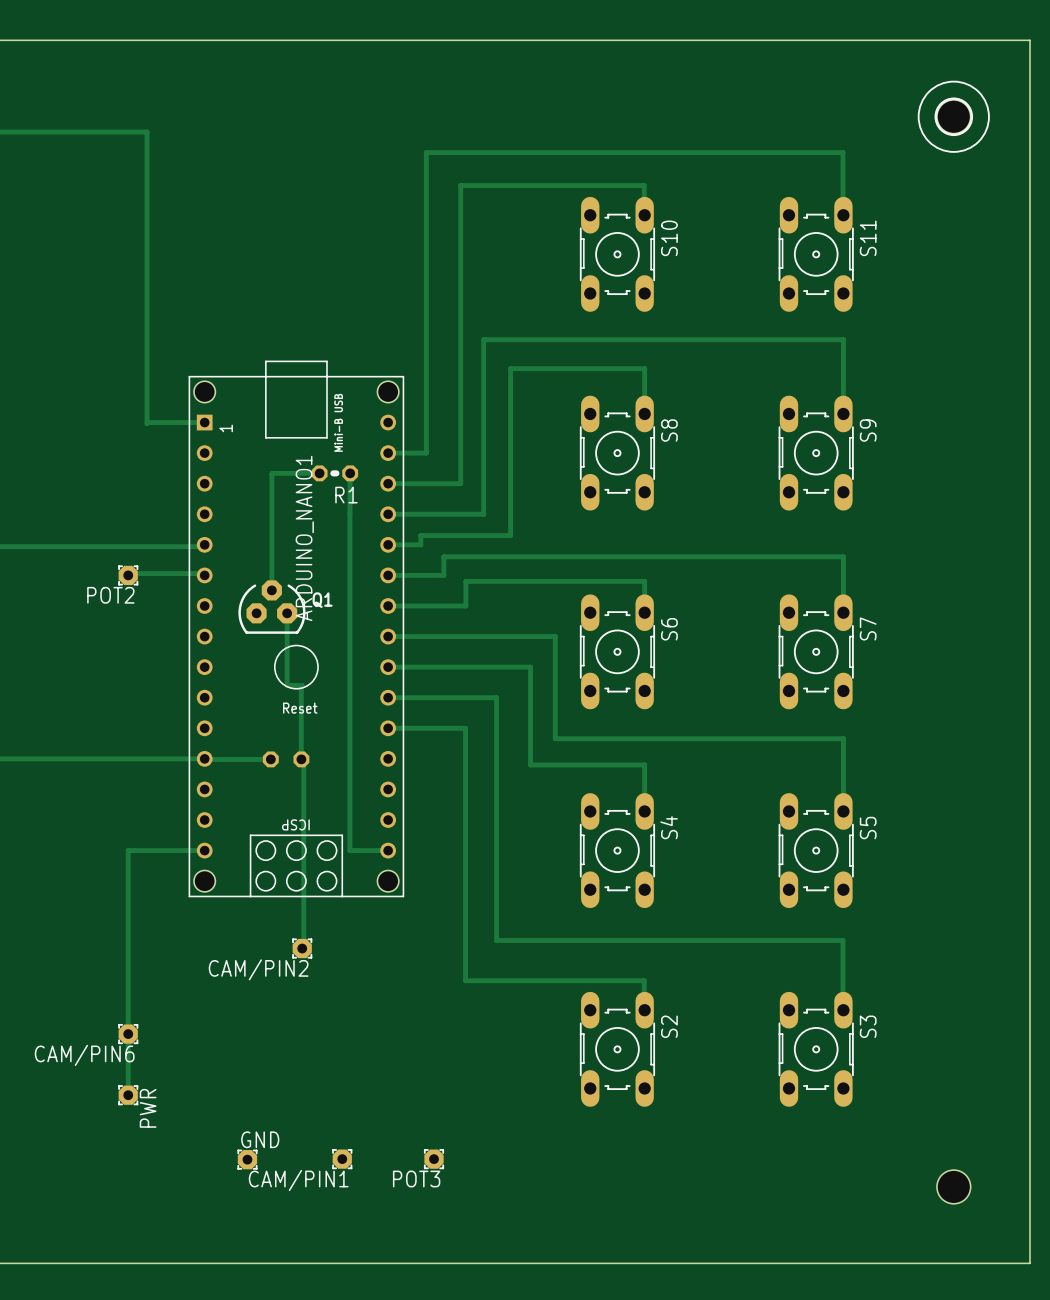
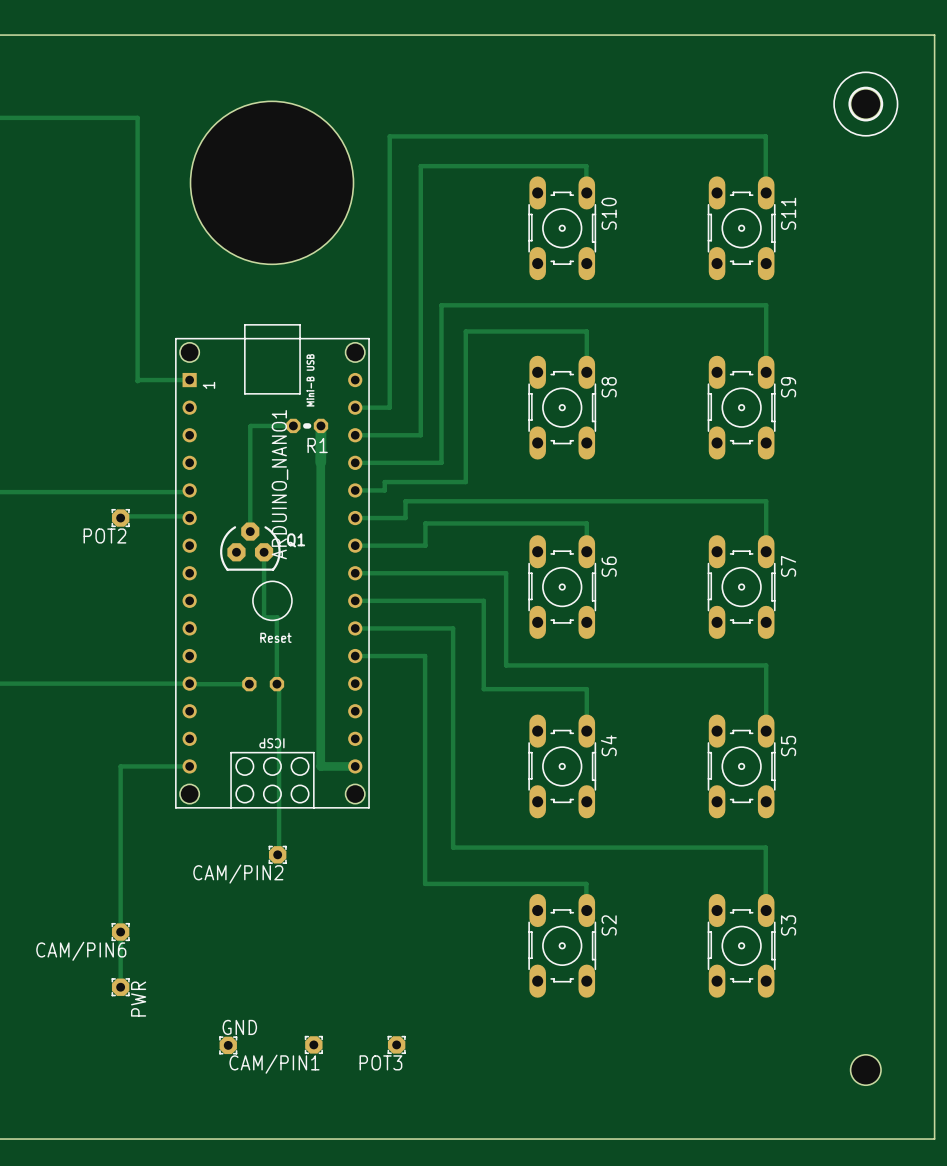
hole: none -> (272, 182)
track width: thin (350, 473) (349, 850) (388, 850) -> thick (320, 425) (320, 766) (355, 766)

